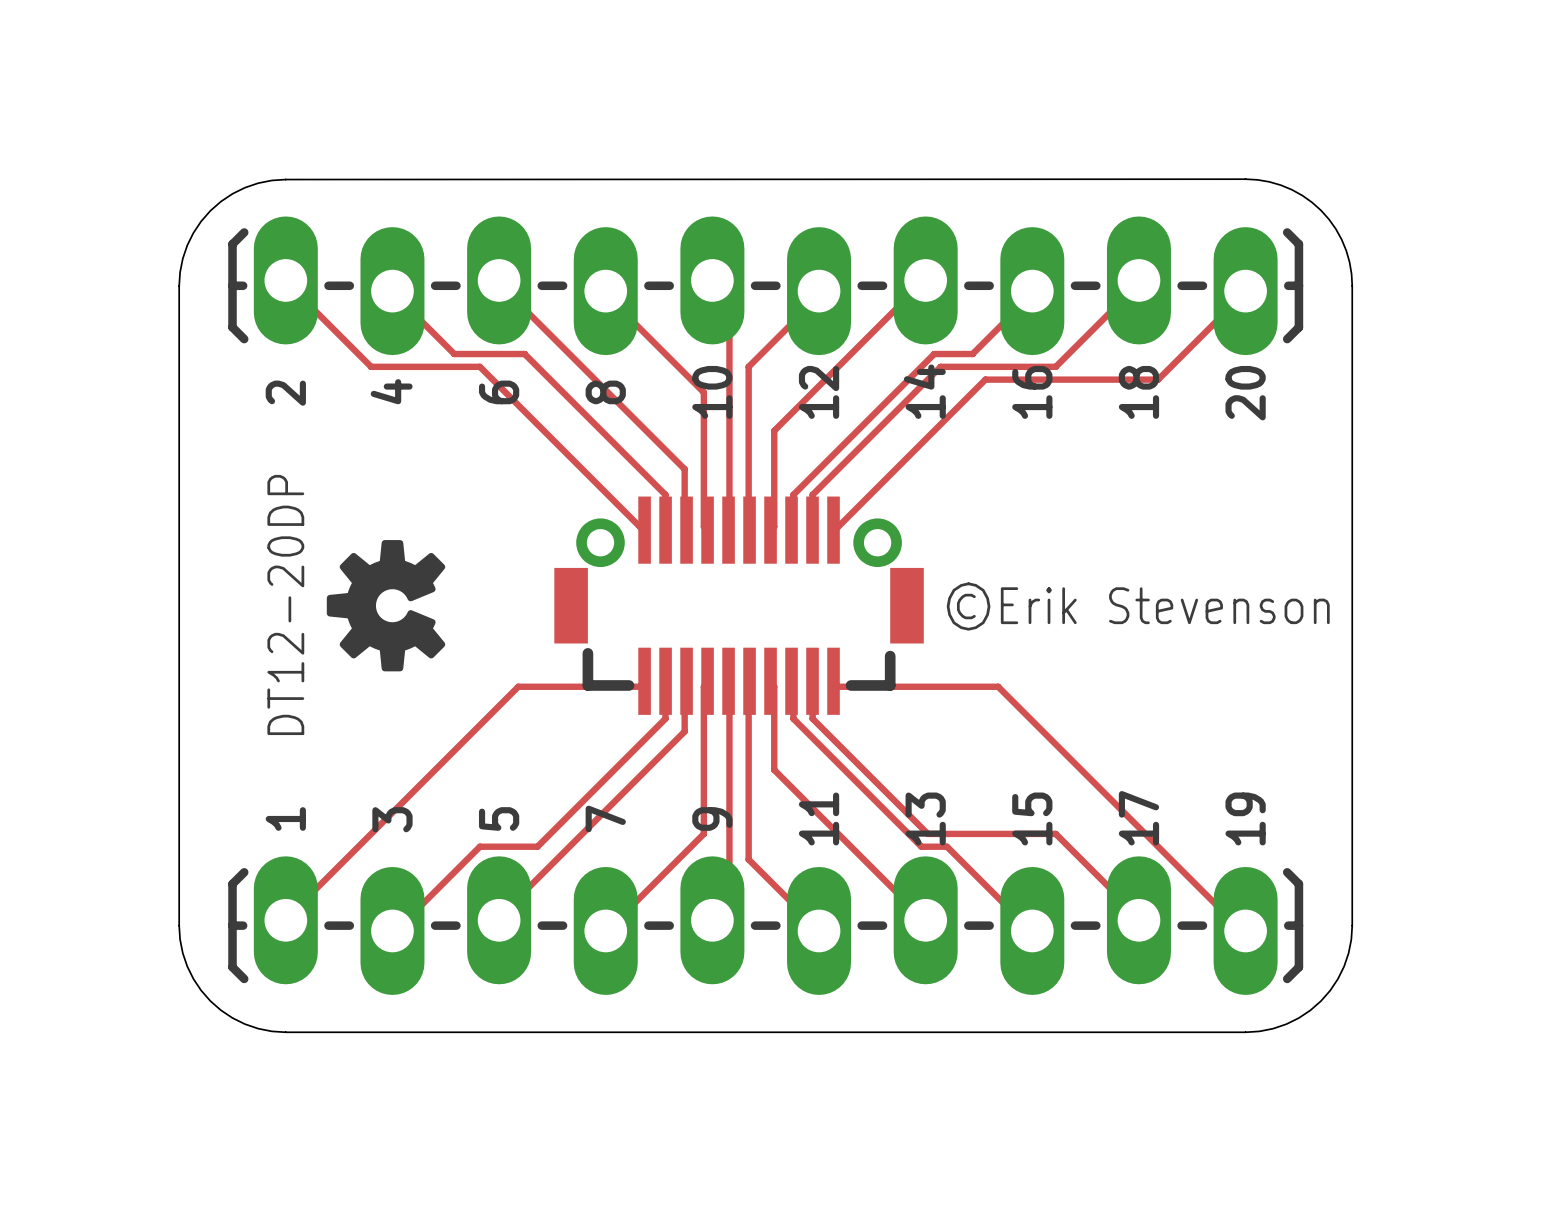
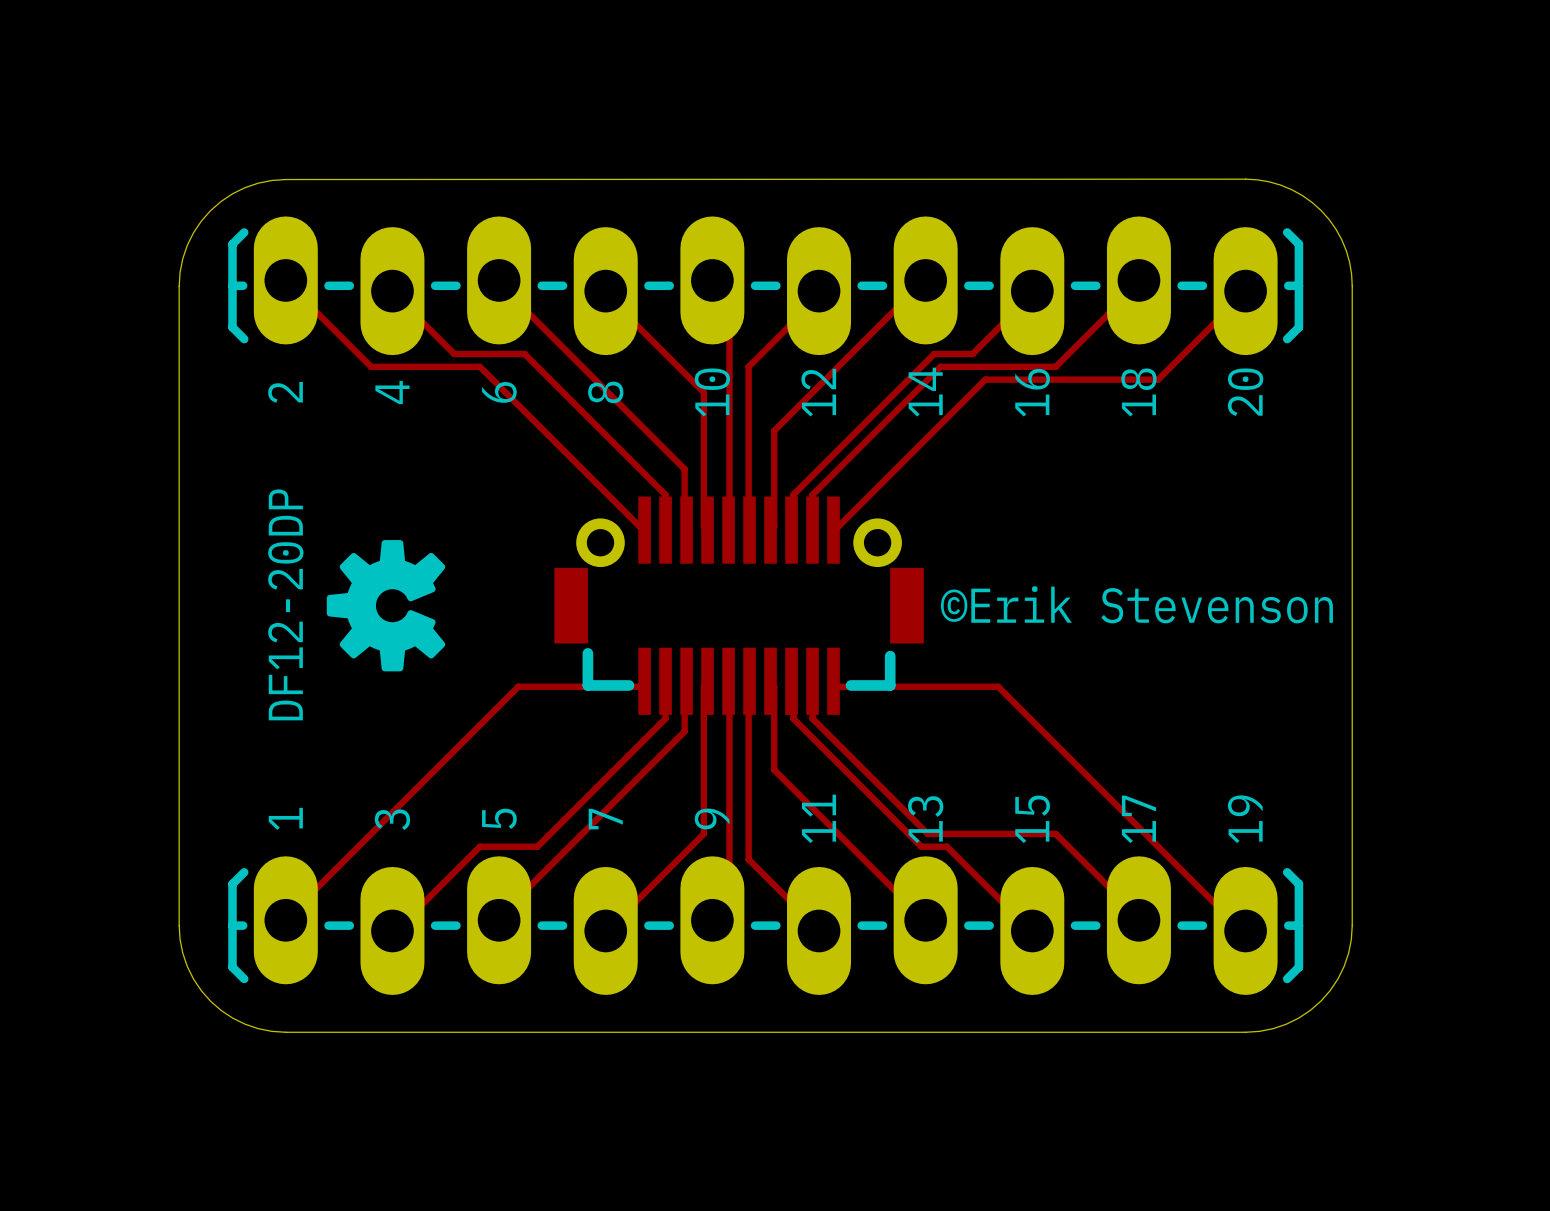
text: DT12-20DP (285, 604) -> DF12-20DP (285, 604)

